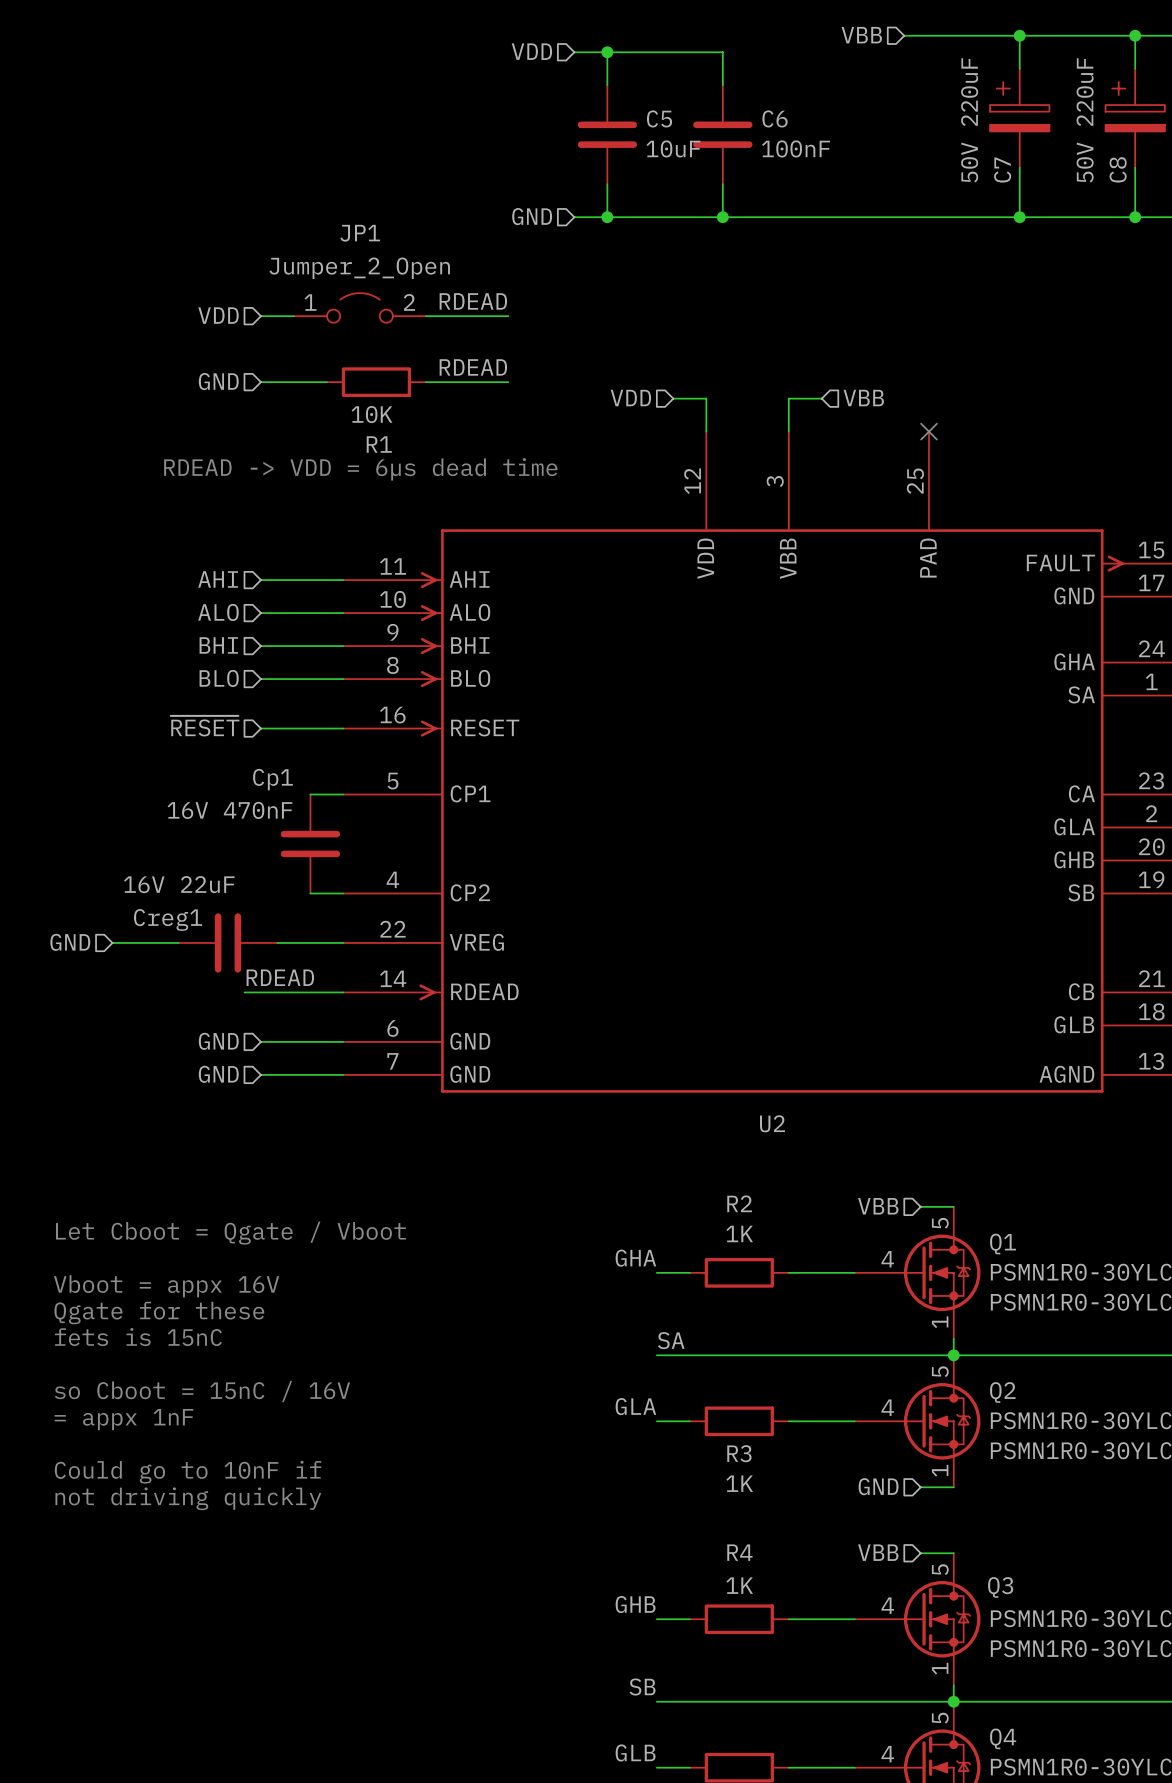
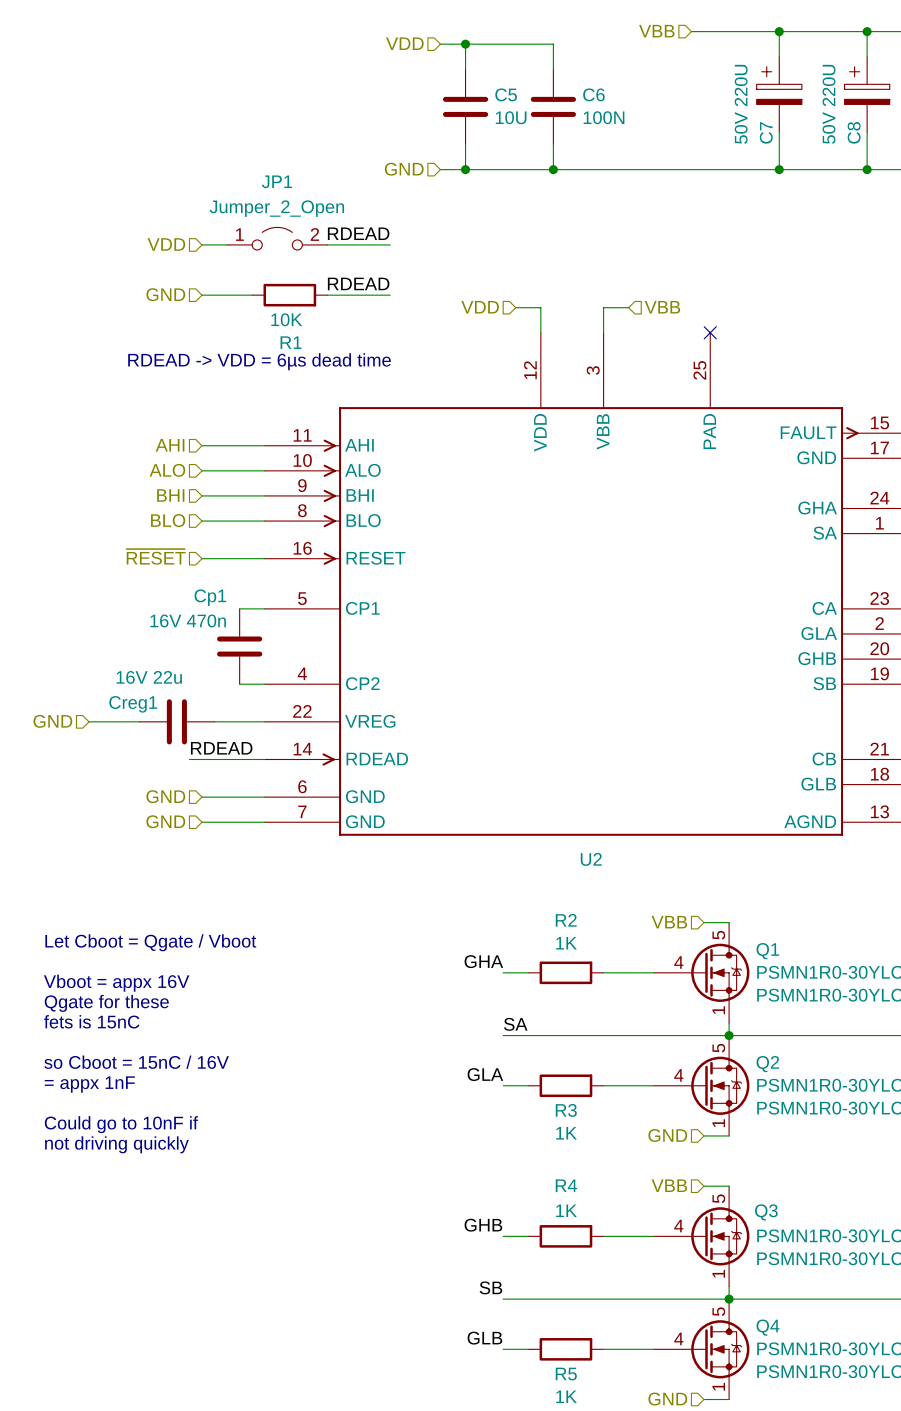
C7 value: 50V 220uF (969, 120) -> 50V 220U (741, 104)
C8 value: 50V 220uF (1085, 120) -> 50V 220U (829, 104)
C5 value: 10uF (673, 148) -> 10U (511, 117)
C6 value: 100nF (796, 148) -> 100N (604, 117)
Cp1 value: 16V 470nF (229, 810) -> 16V 470n (188, 620)
Creg1 value: 16V 22uF (179, 884) -> 16V 22u (149, 677)

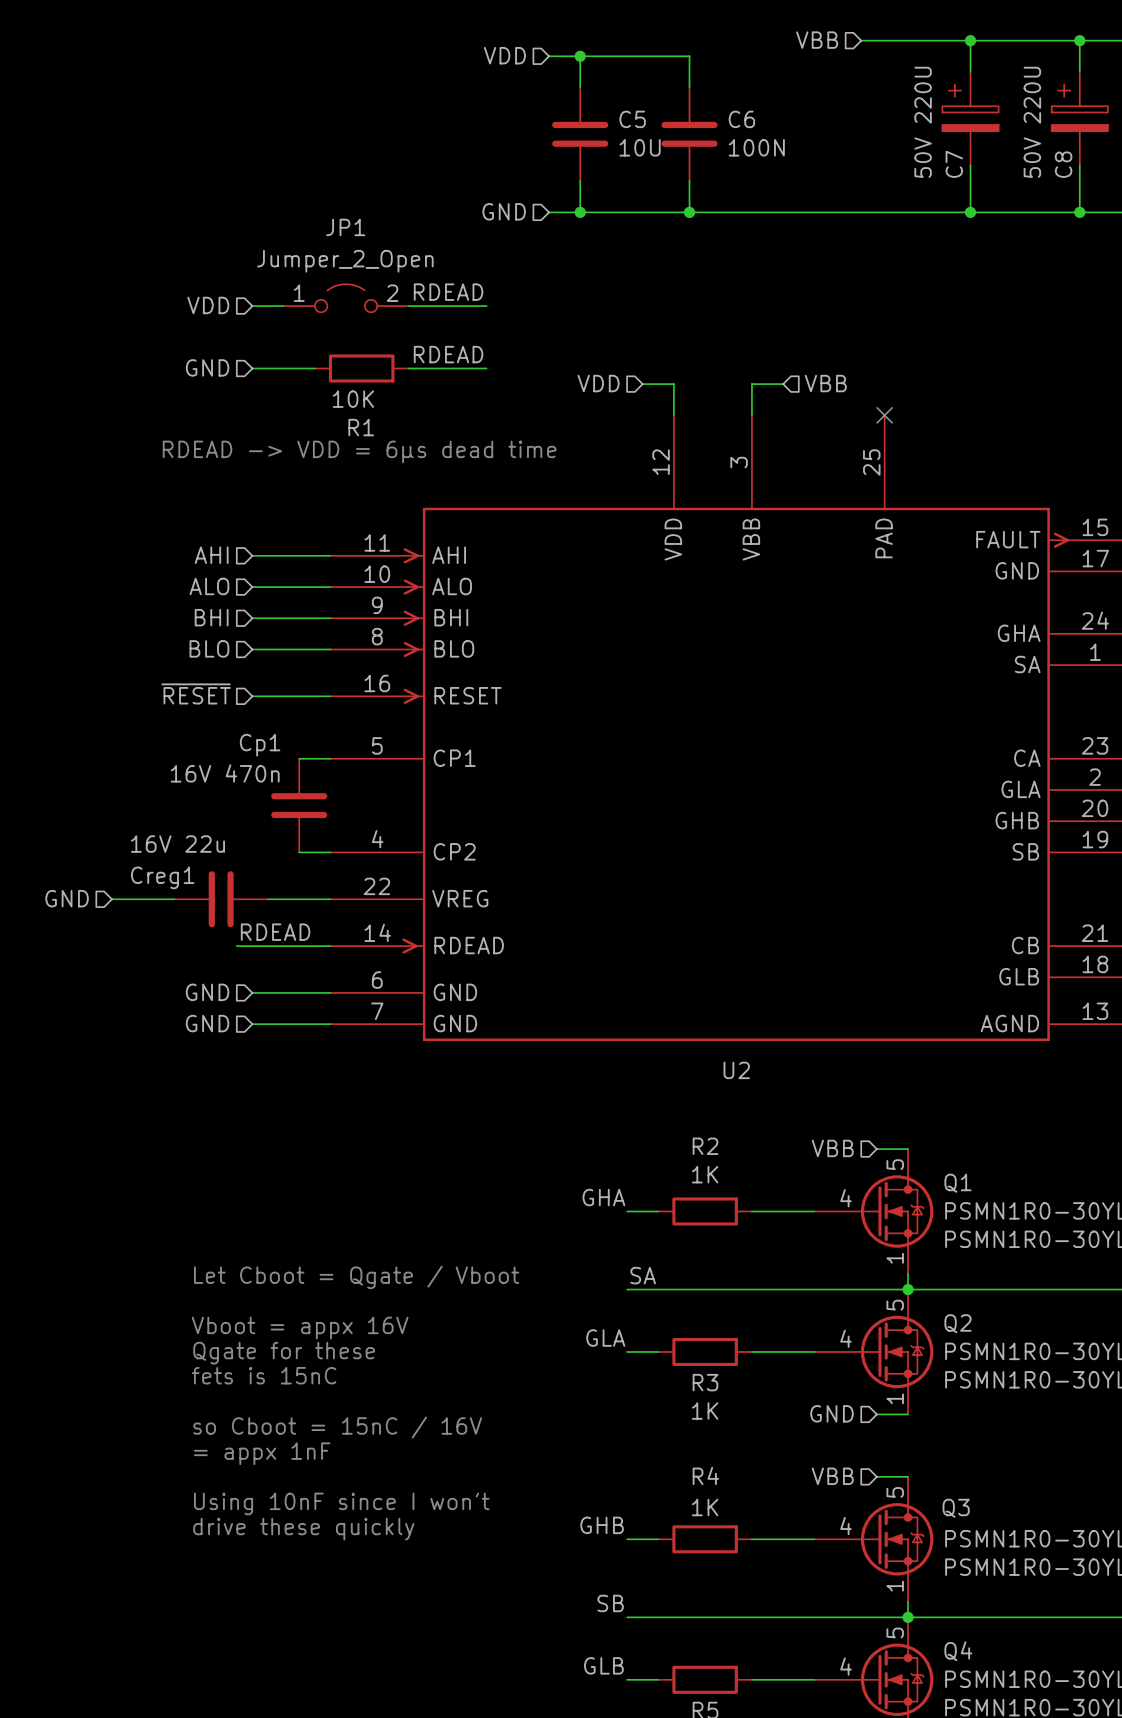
text position: Let Cboot = Qgate / Vboot (150, 942) -> Let Cboot = Qgate / Vboot (356, 1277)
text position: Vboot = appx 16V (116, 983) -> Vboot = appx 16V (300, 1328)
text position: Qgate for these (106, 1003) -> Qgate for these (284, 1353)
text position: fets is 15nC (91, 1021) -> fets is 15nC (264, 1375)
text position: so Cboot = 15nC / 16V (136, 1062) -> so Cboot = 15nC / 16V (337, 1427)
text position: = appx 1nF (89, 1084) -> = appx 1nF (262, 1453)
text: Could go to 10nF if (121, 1124) -> none
text: not driving quickly (116, 1144) -> none
text: none -> Using 10nF since I won't (341, 1503)
text: none -> drive these quickly (303, 1529)

